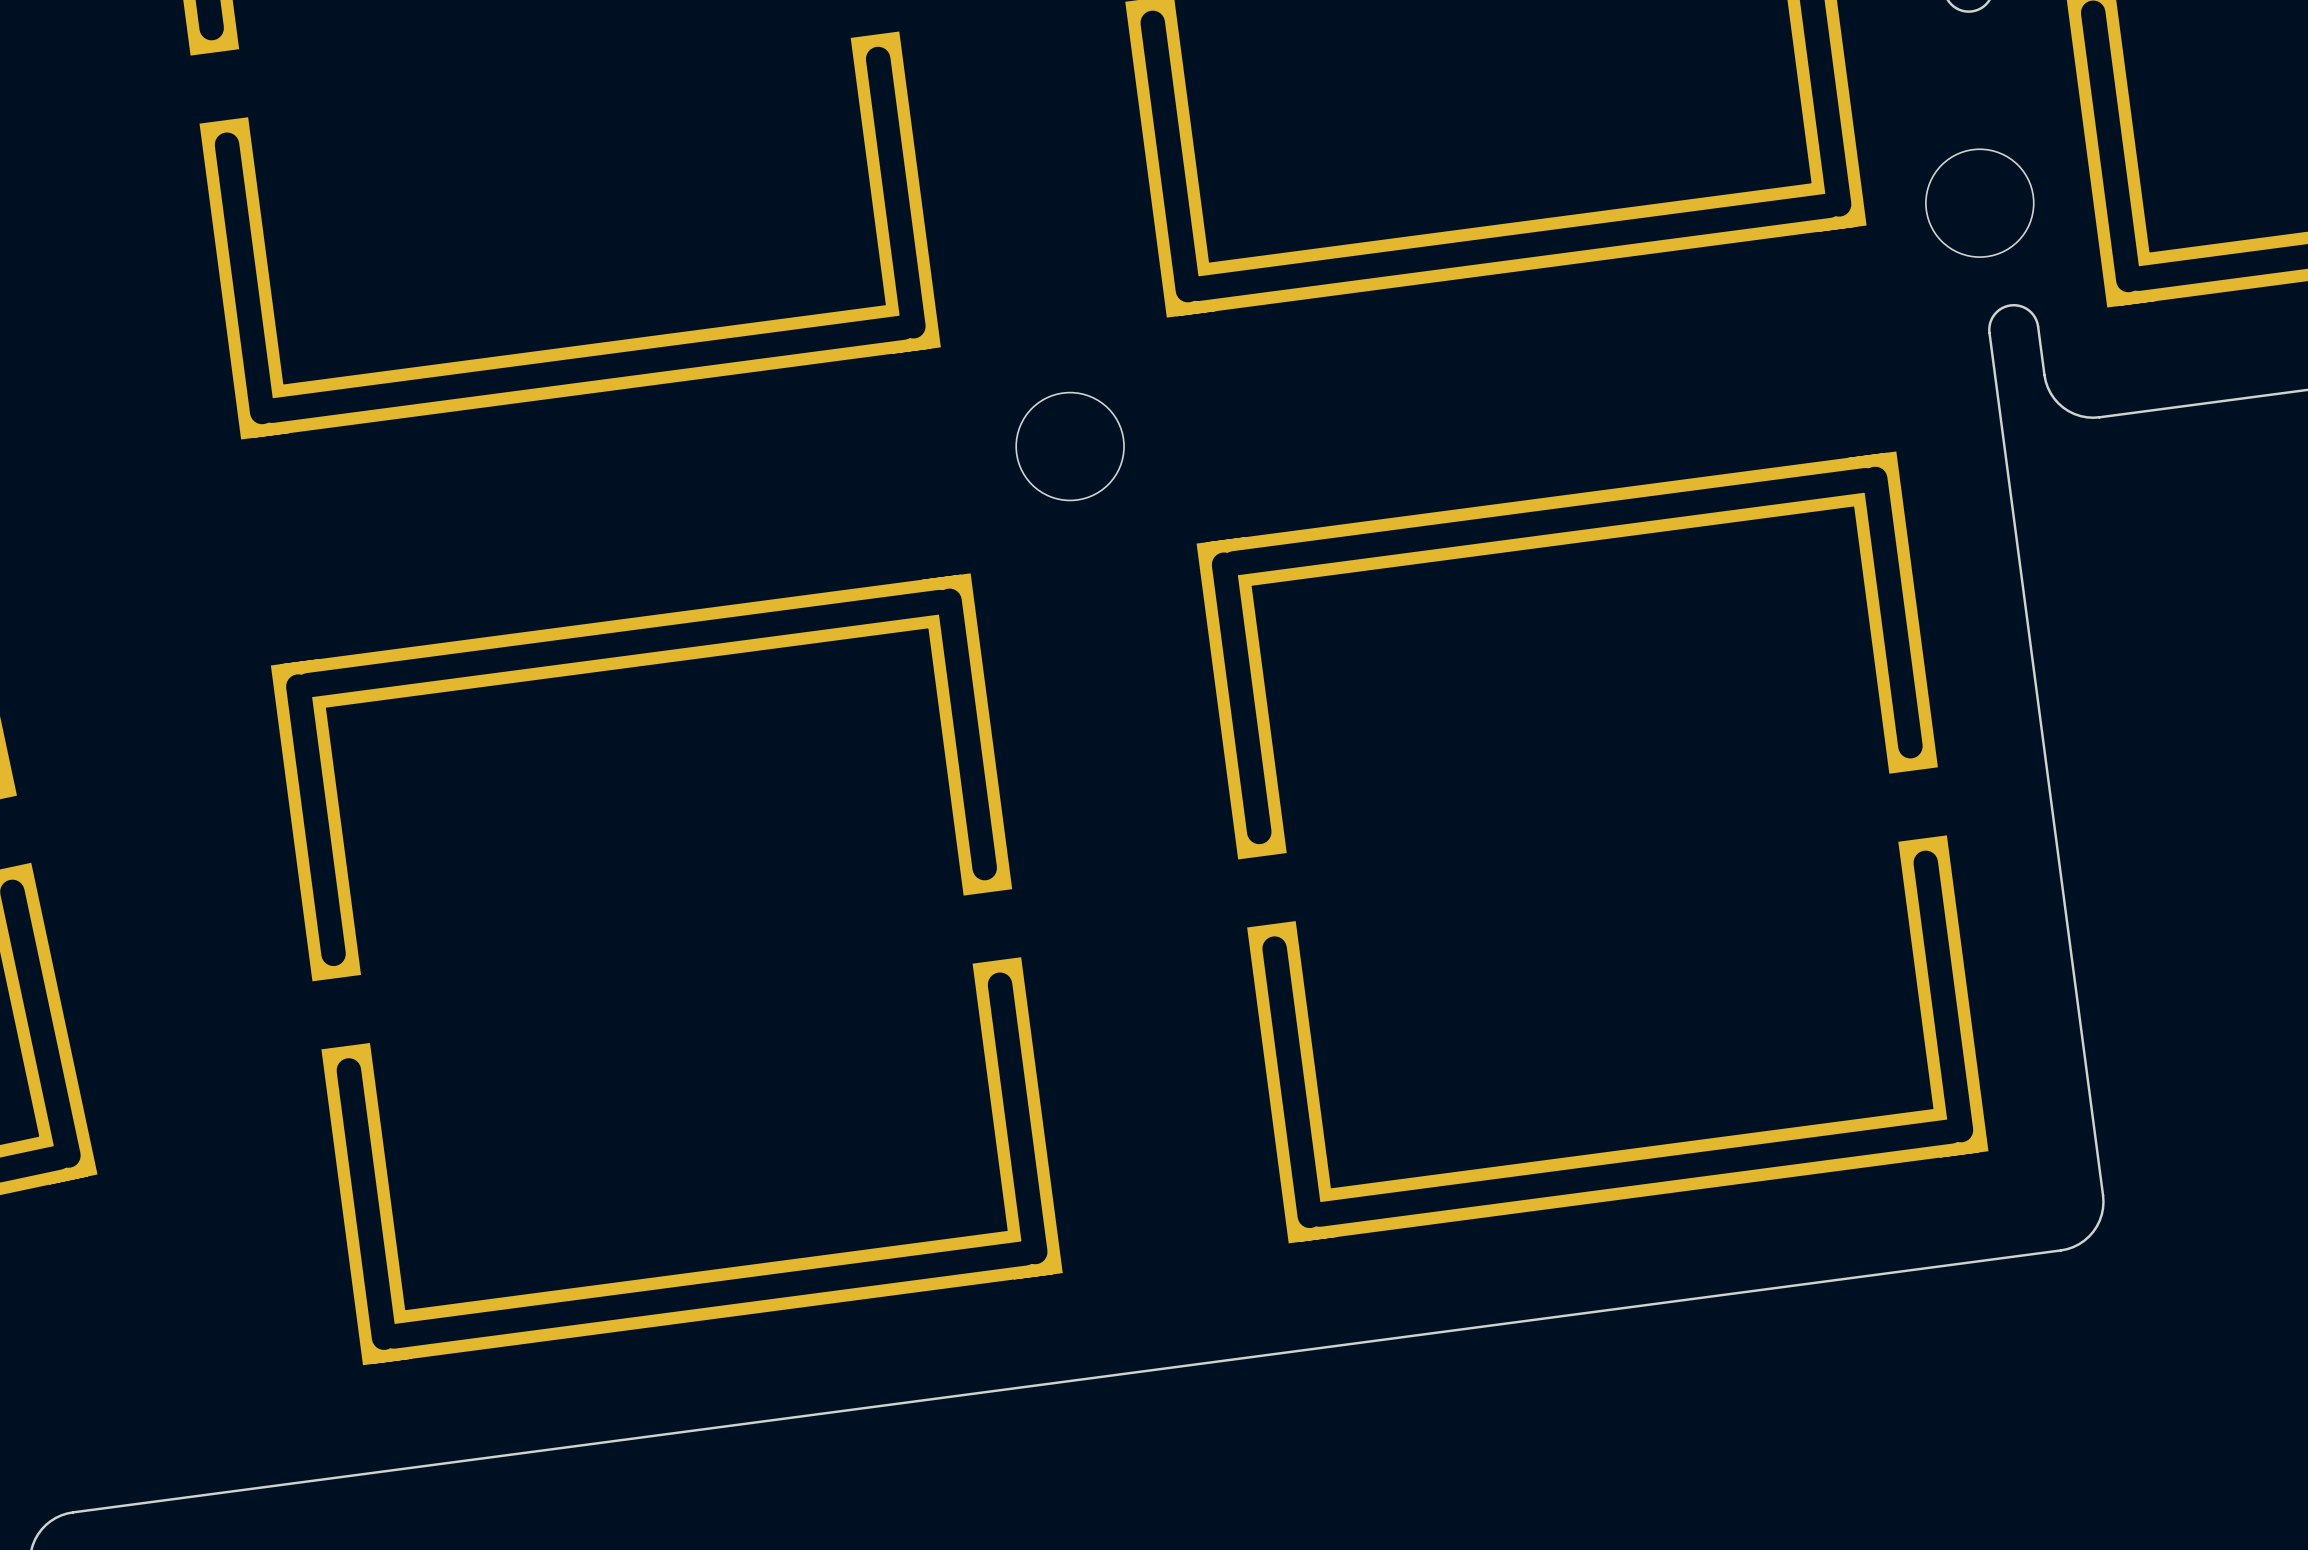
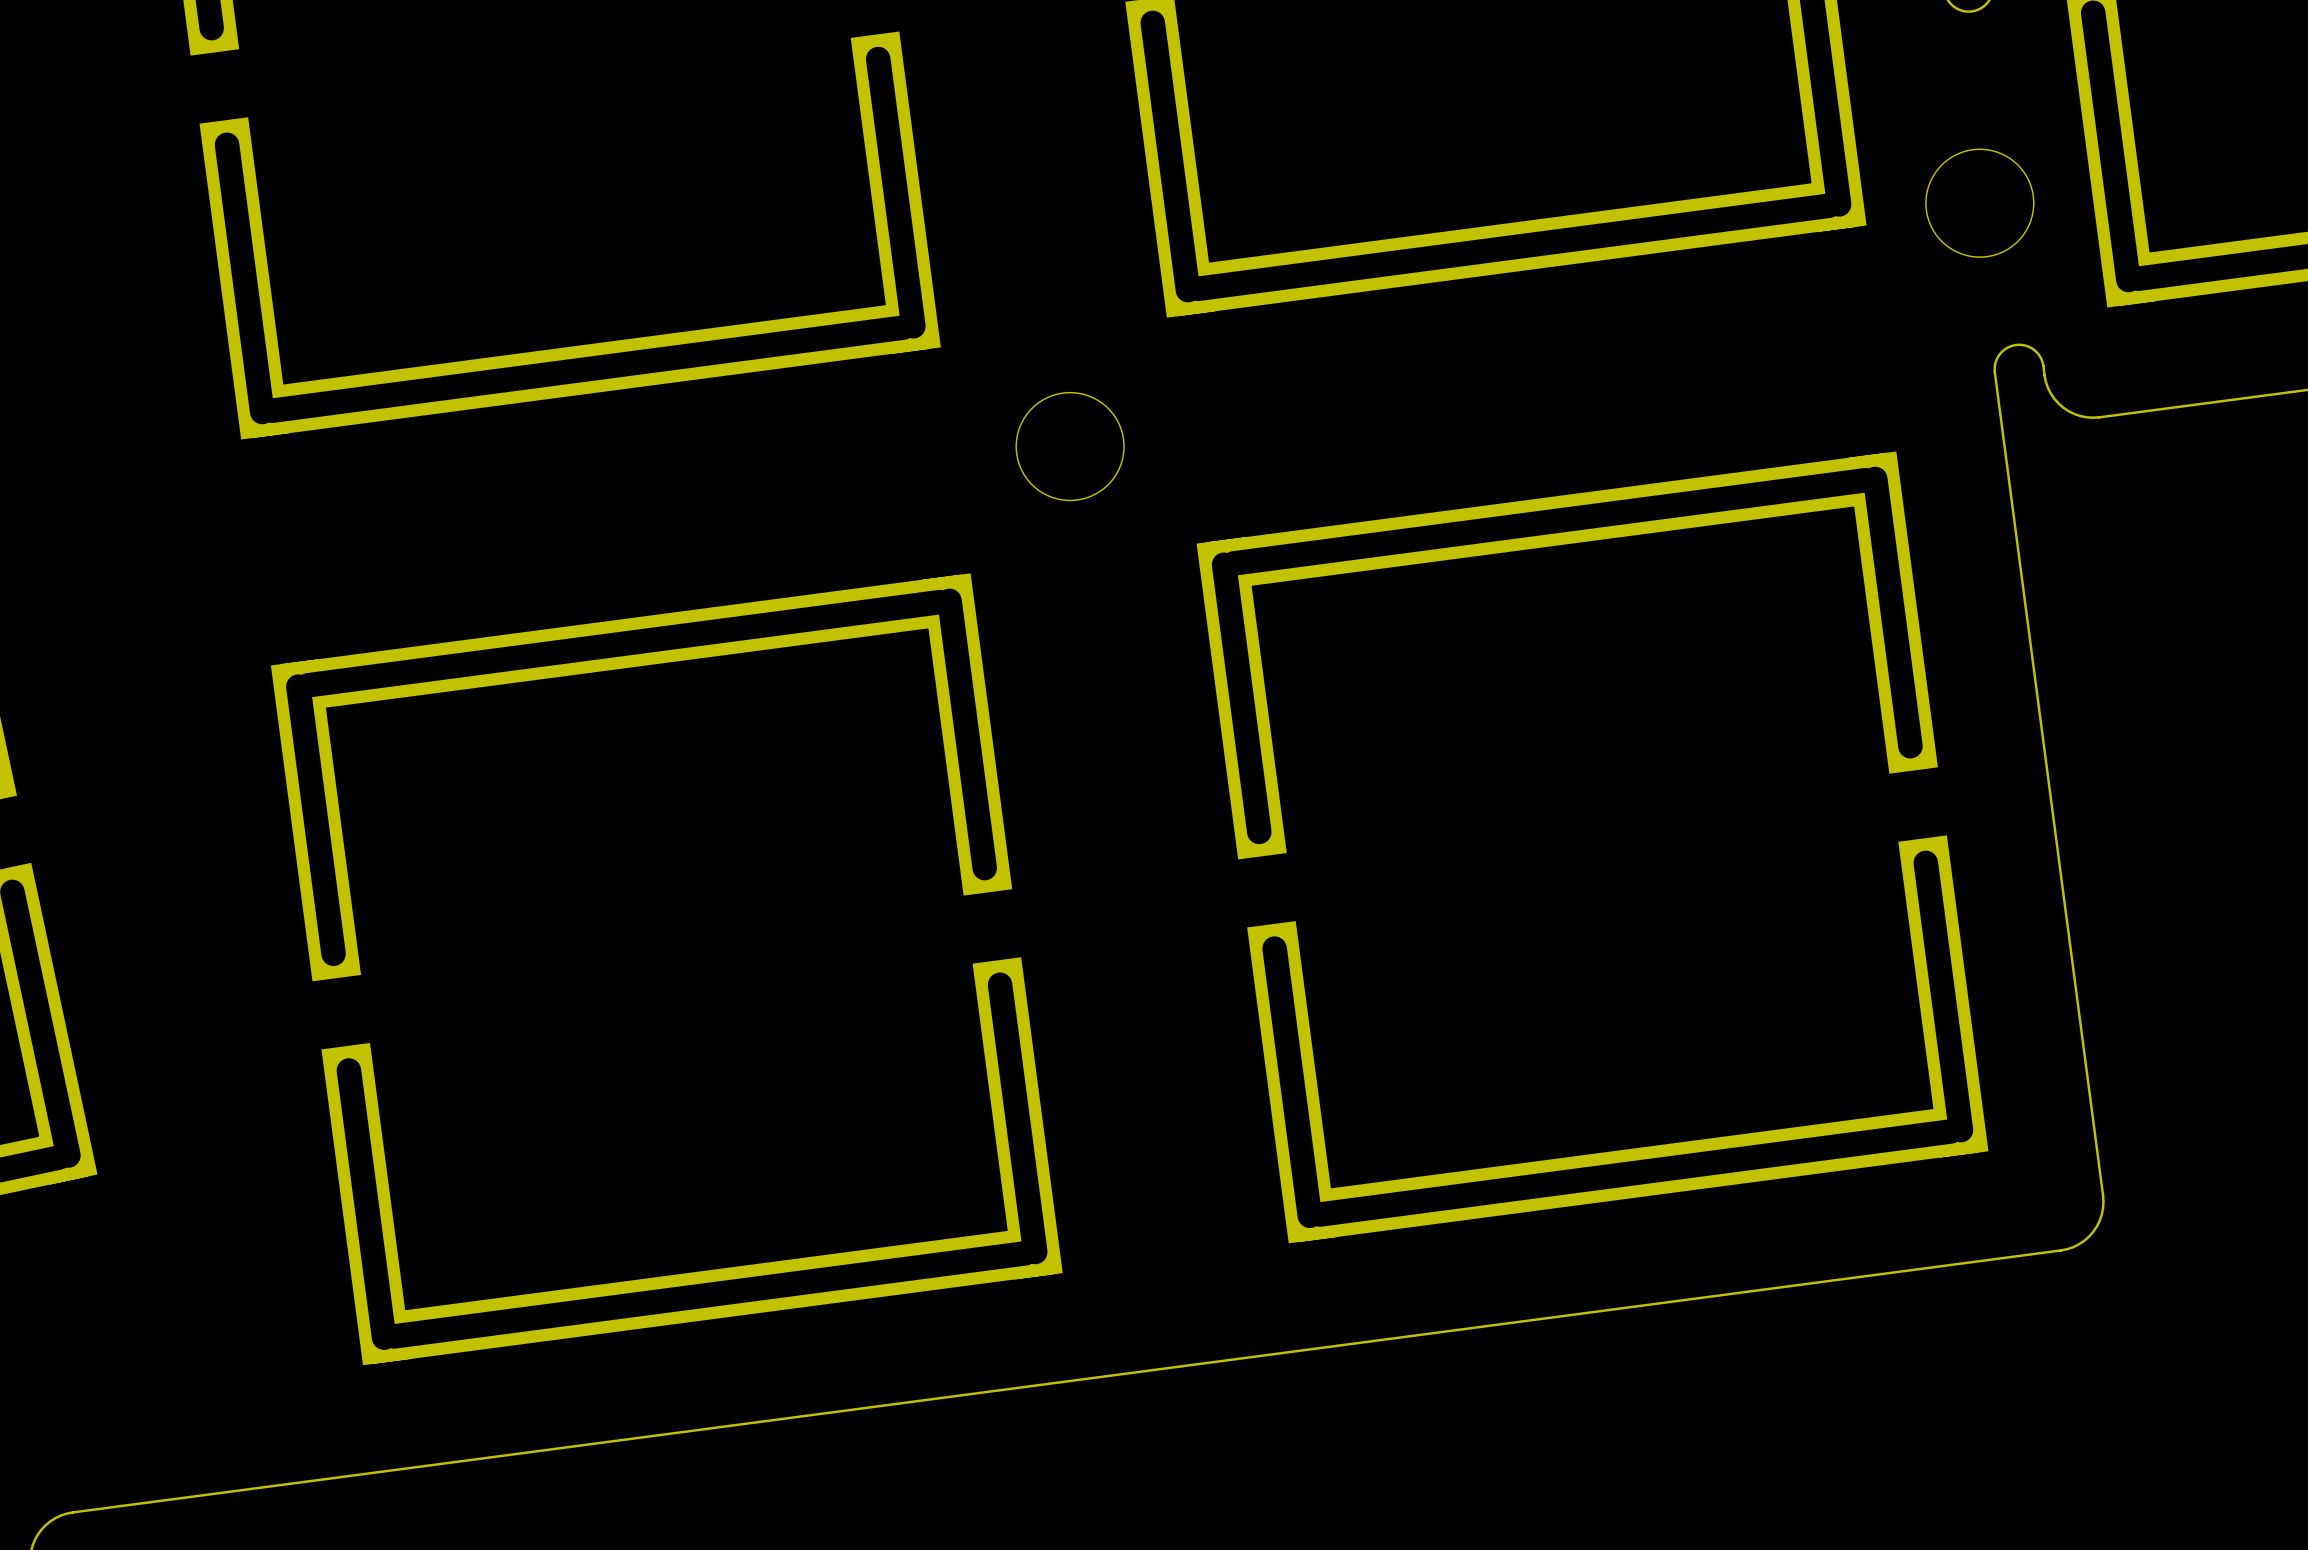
board edge: (2099, 417) (2086, 417) (2074, 413) (2063, 407) (2050, 393) (2044, 375) (2037, 323) (2031, 312) (2023, 307) (2013, 305) (2004, 307) (1996, 312) (1991, 320) (1989, 332) (2103, 1195) (2101, 1214) (2093, 1231) (2078, 1244) (2060, 1250) -> (2099, 417) (2086, 417) (2074, 414) (2058, 403) (2047, 387) (2041, 359) (2031, 348) (2022, 344) (2012, 345) (2004, 349) (1997, 357) (1994, 372) (2103, 1195) (2101, 1214) (2093, 1231) (2078, 1244) (2060, 1250)

